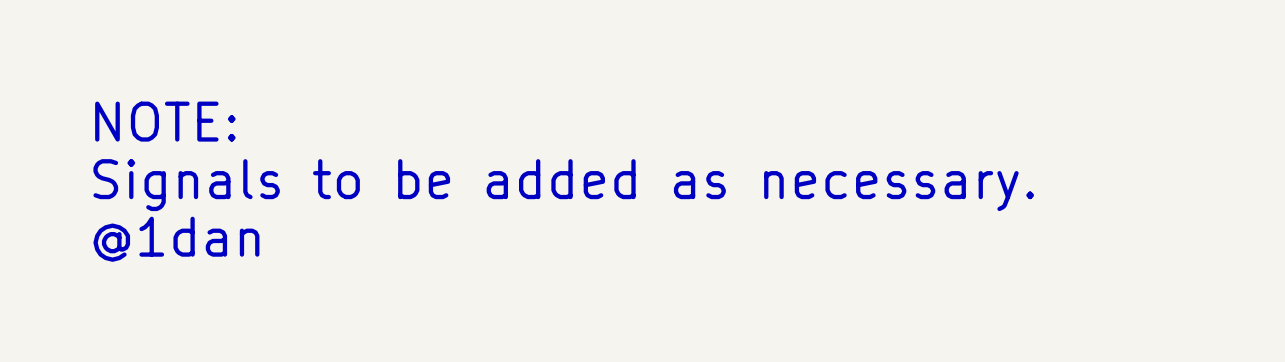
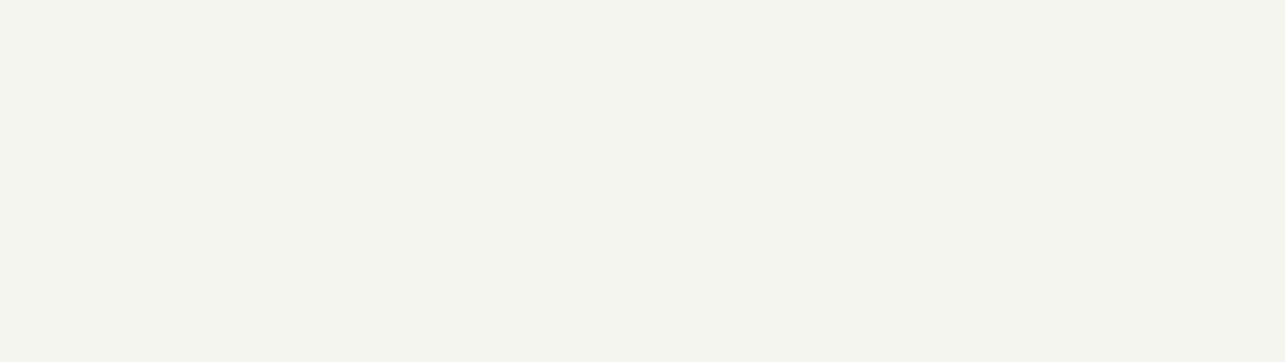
text: NOTE: (165, 121) -> none
text: Signals to be added as necessary. (563, 185) -> none
text: @1dan (176, 239) -> none

